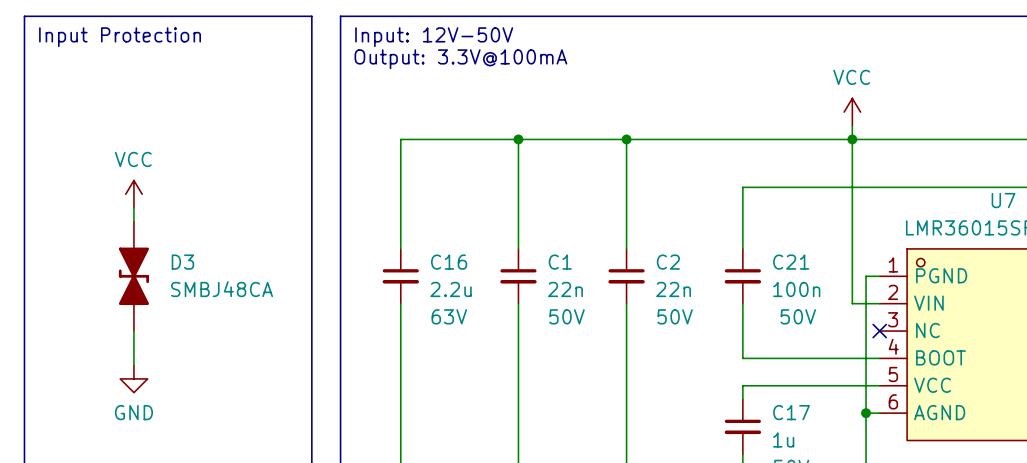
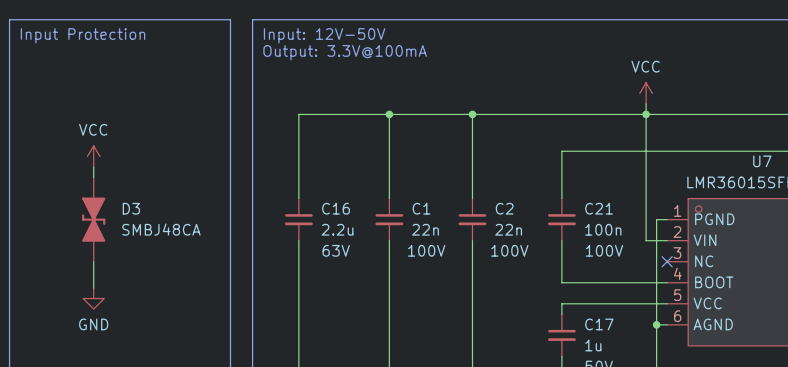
C1 text: 50V (567, 316) -> 100V (426, 250)
C2 text: 50V (675, 316) -> 100V (509, 250)
C21 text: 50V (798, 316) -> 100V (604, 250)

